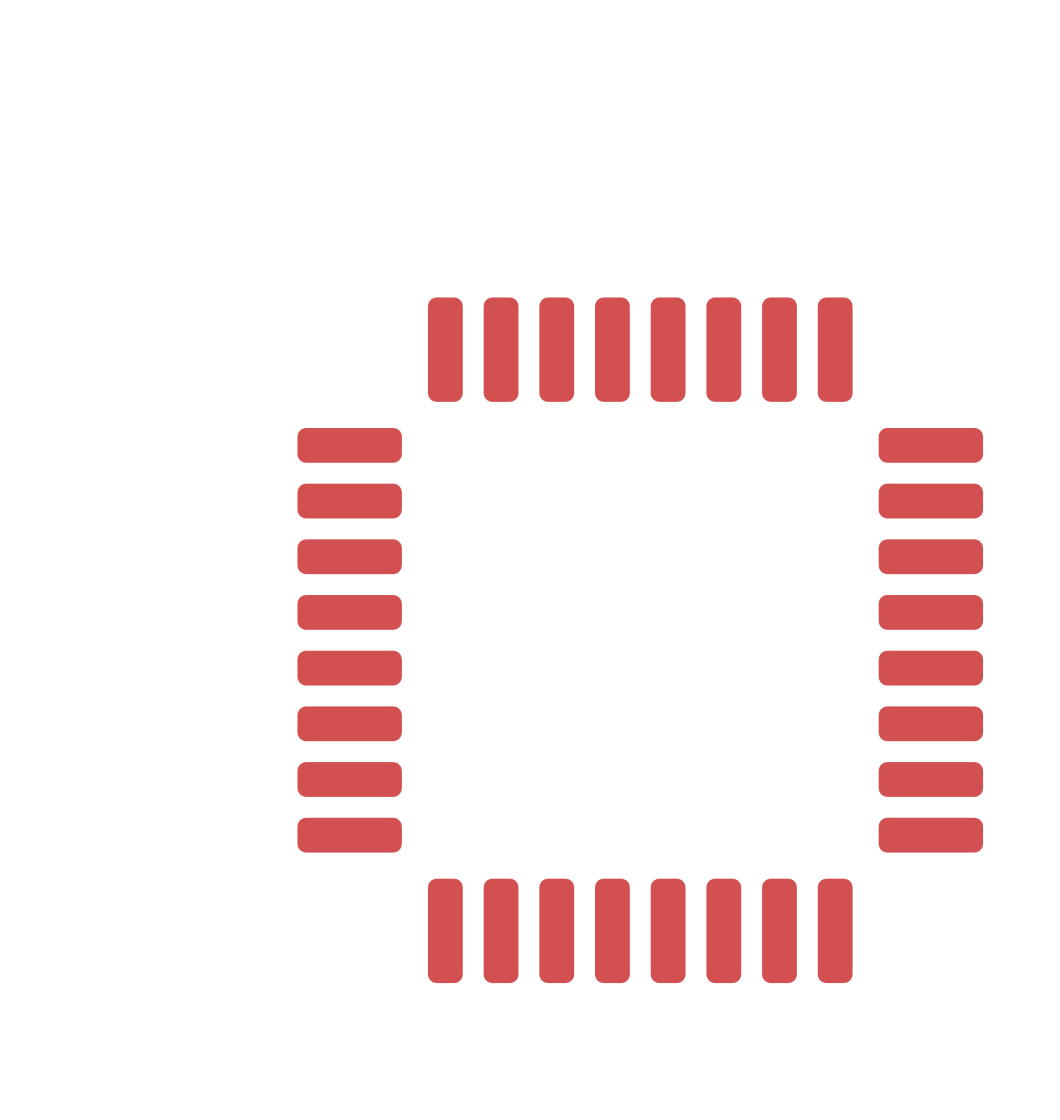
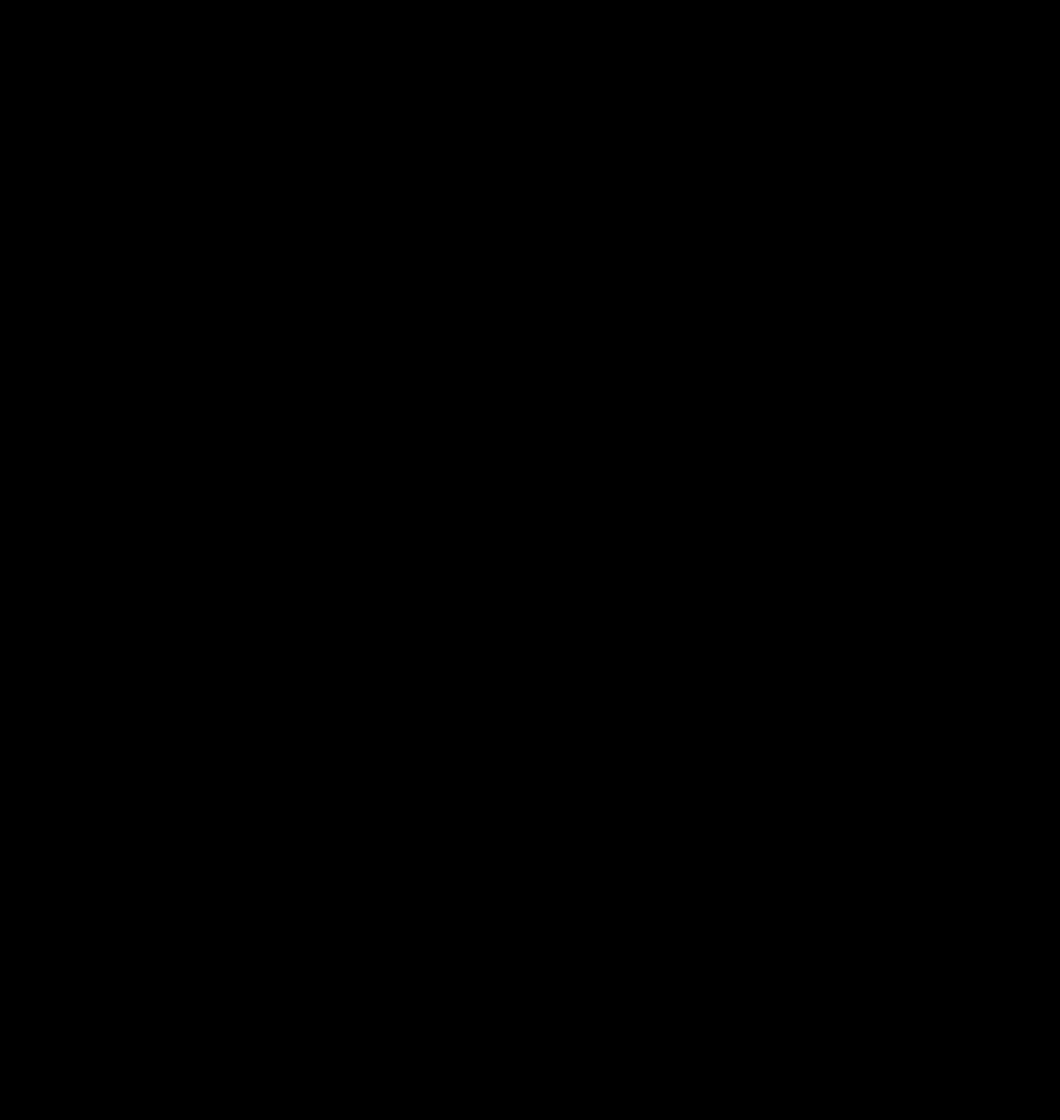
part: (640, 640) -> none

